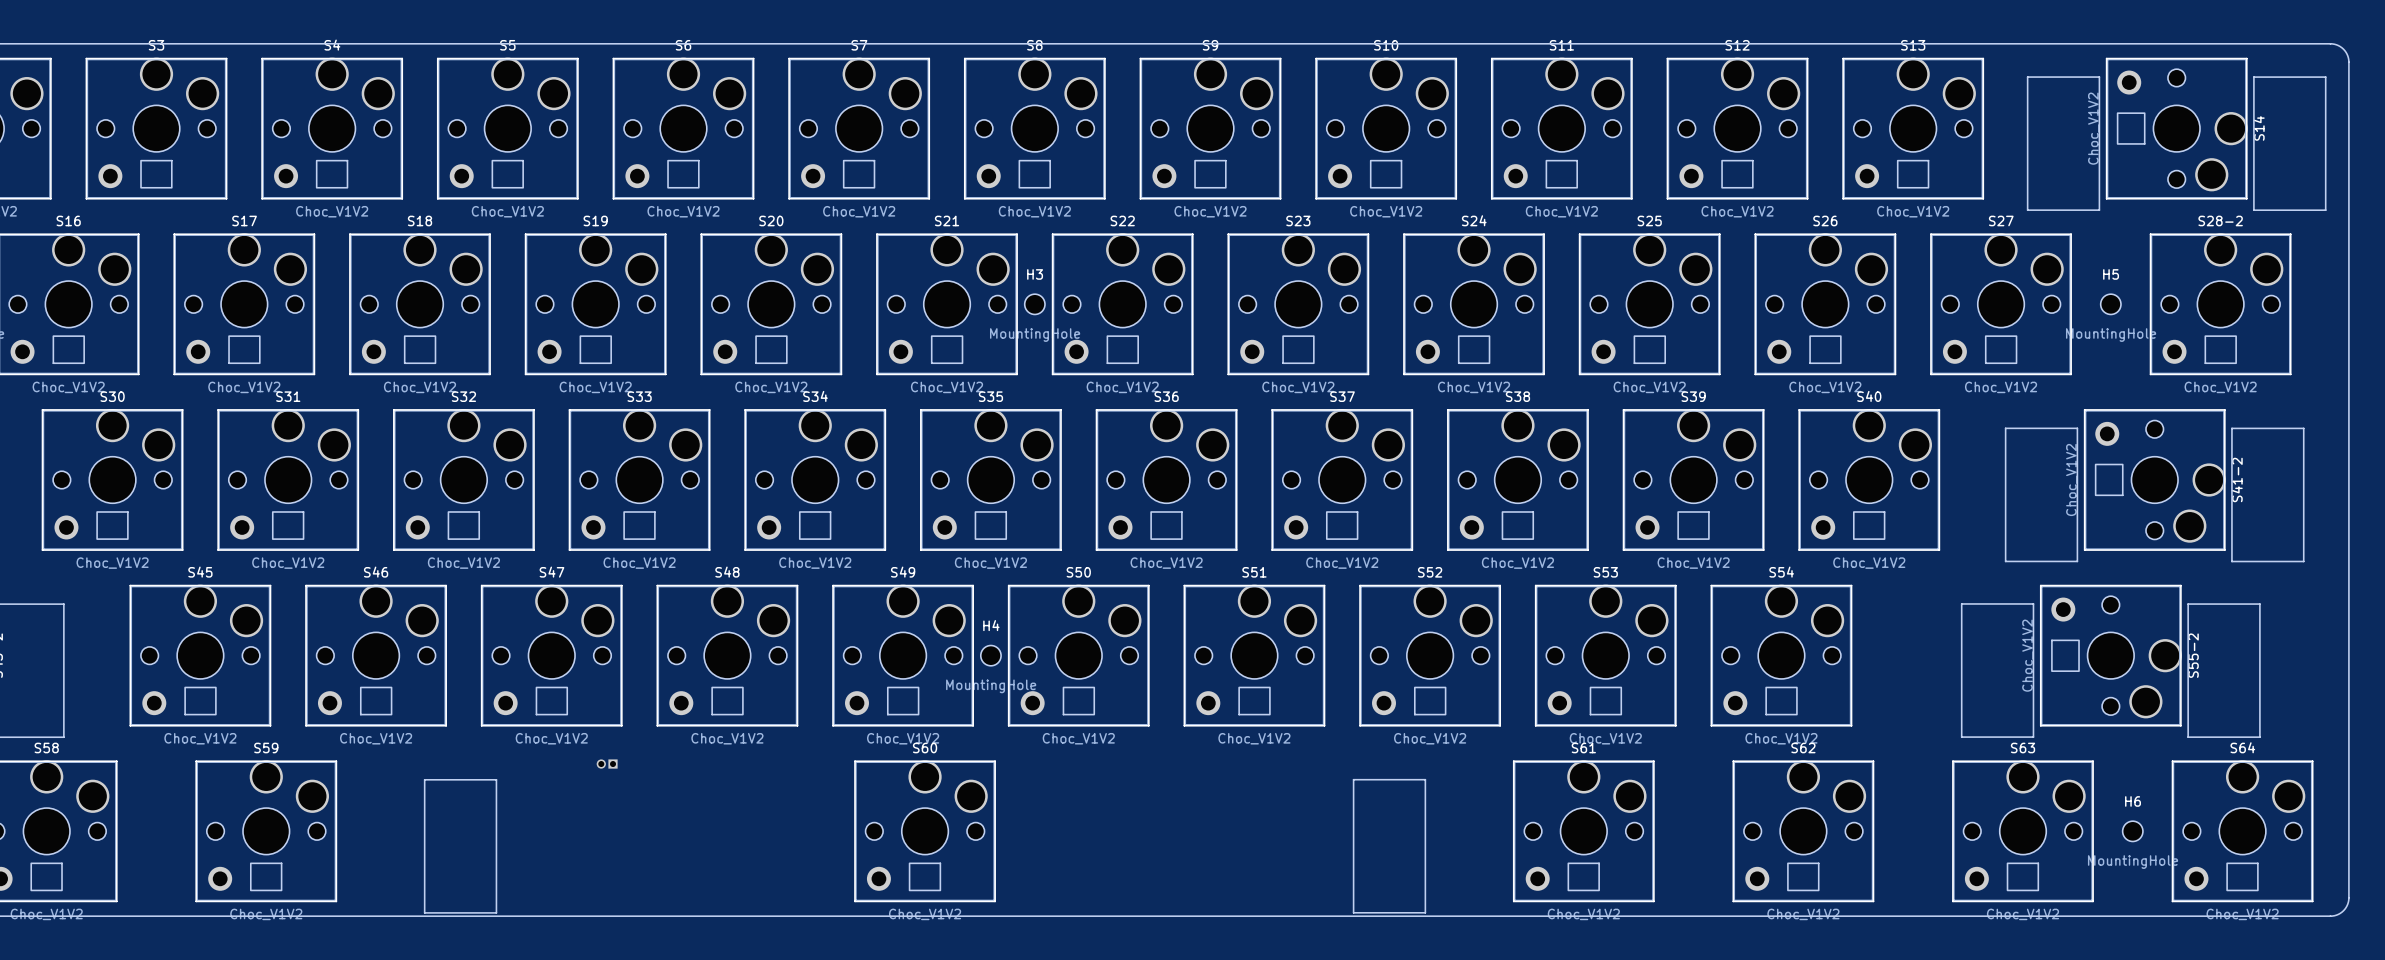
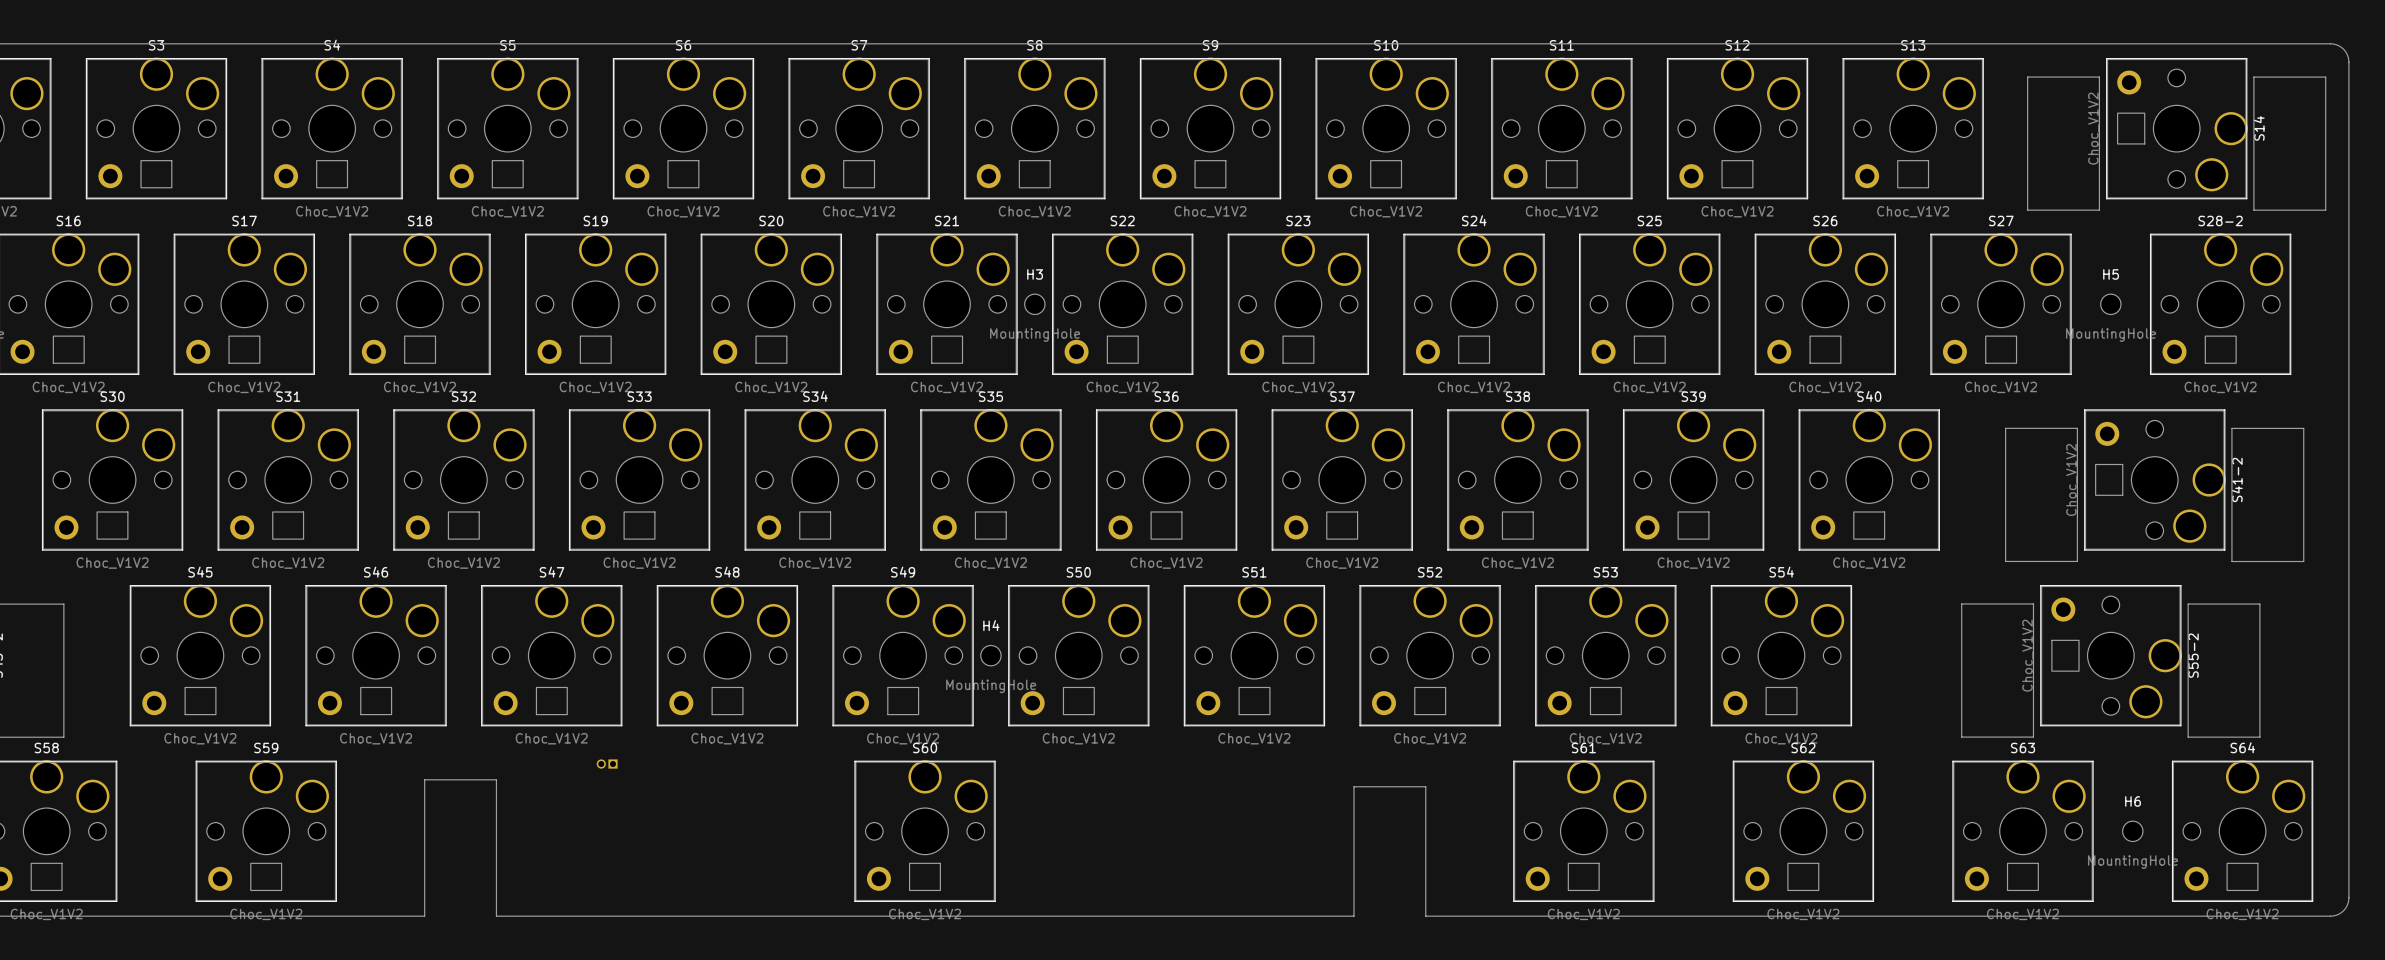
board edge: (1353, 779) (1425, 779) (1425, 912) (1353, 912) (1353, 779) -> none
board edge: (424, 912) (496, 912) -> (424, 912) (424, 916)
board edge: (424, 916) (496, 916) -> (496, 912) (496, 916)
board edge: (1353, 916) (1425, 916) -> (1353, 916) (1353, 786) (1425, 786) (1425, 916)

